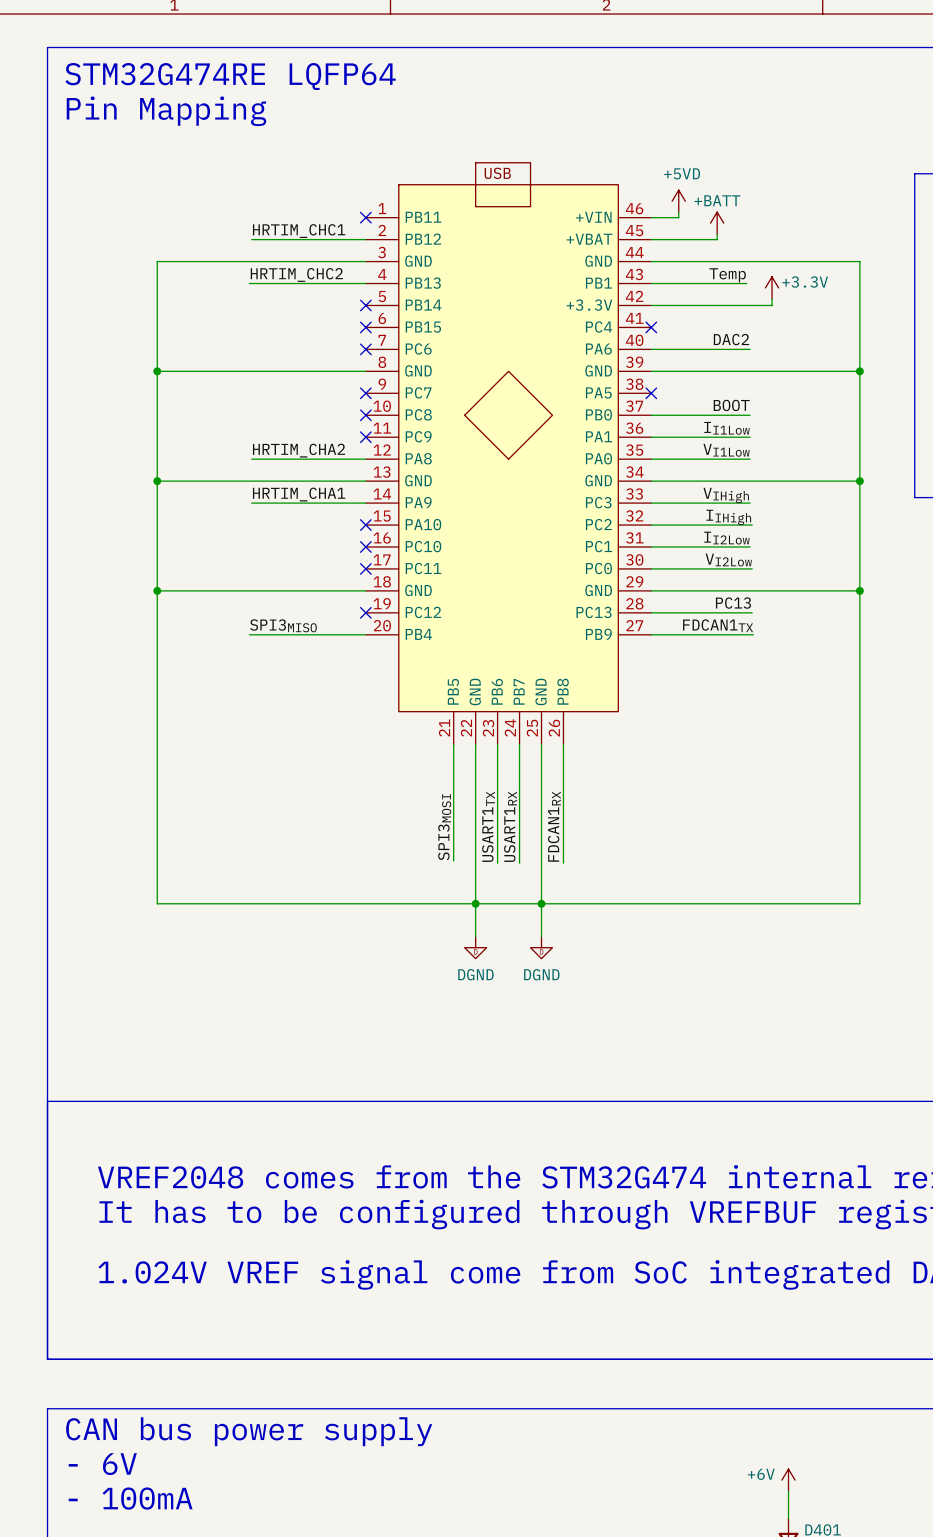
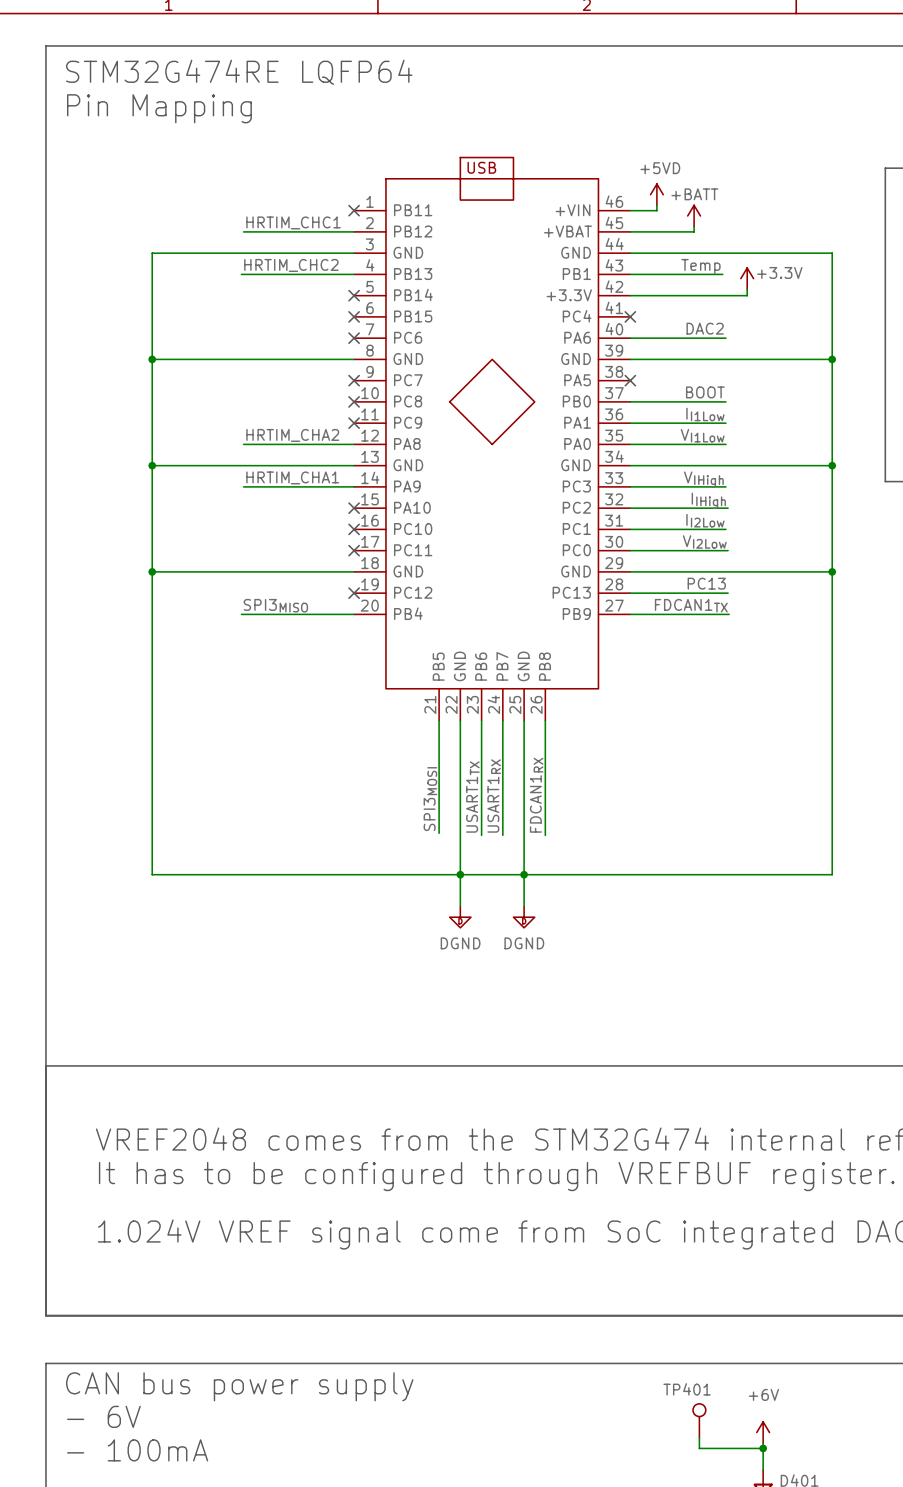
TP401: none -> (699, 1420)
power symbol text position: +6V (761, 1474) -> +6V (763, 1394)
wire: none -> (699, 1437) (699, 1448) (763, 1448)
junction: none -> (763, 1448)

